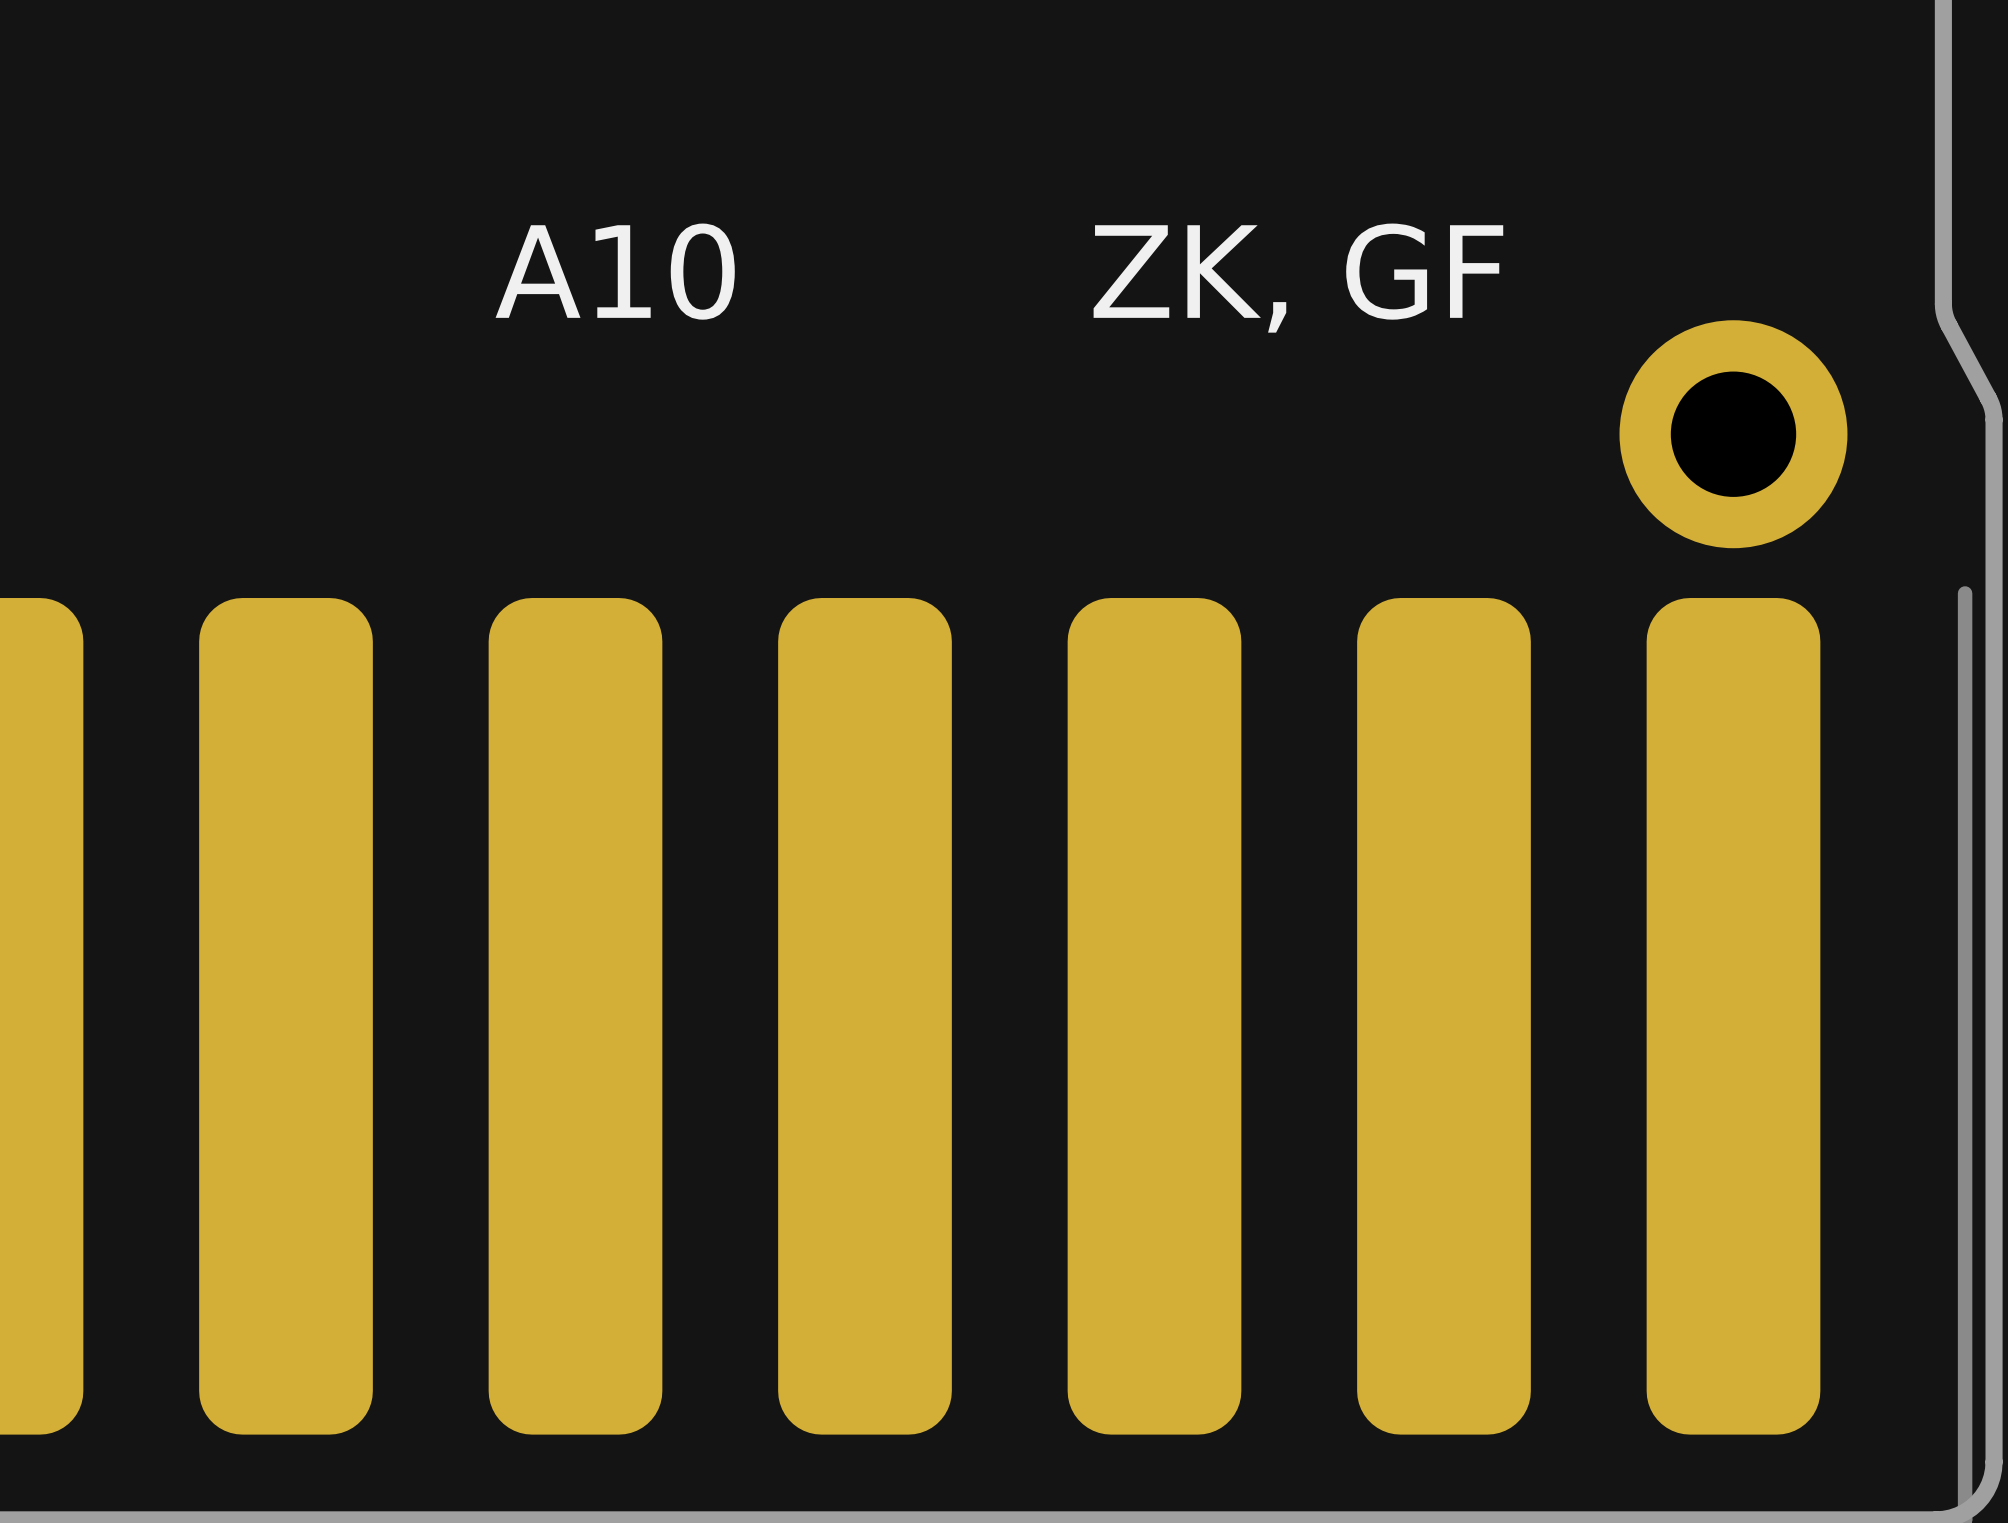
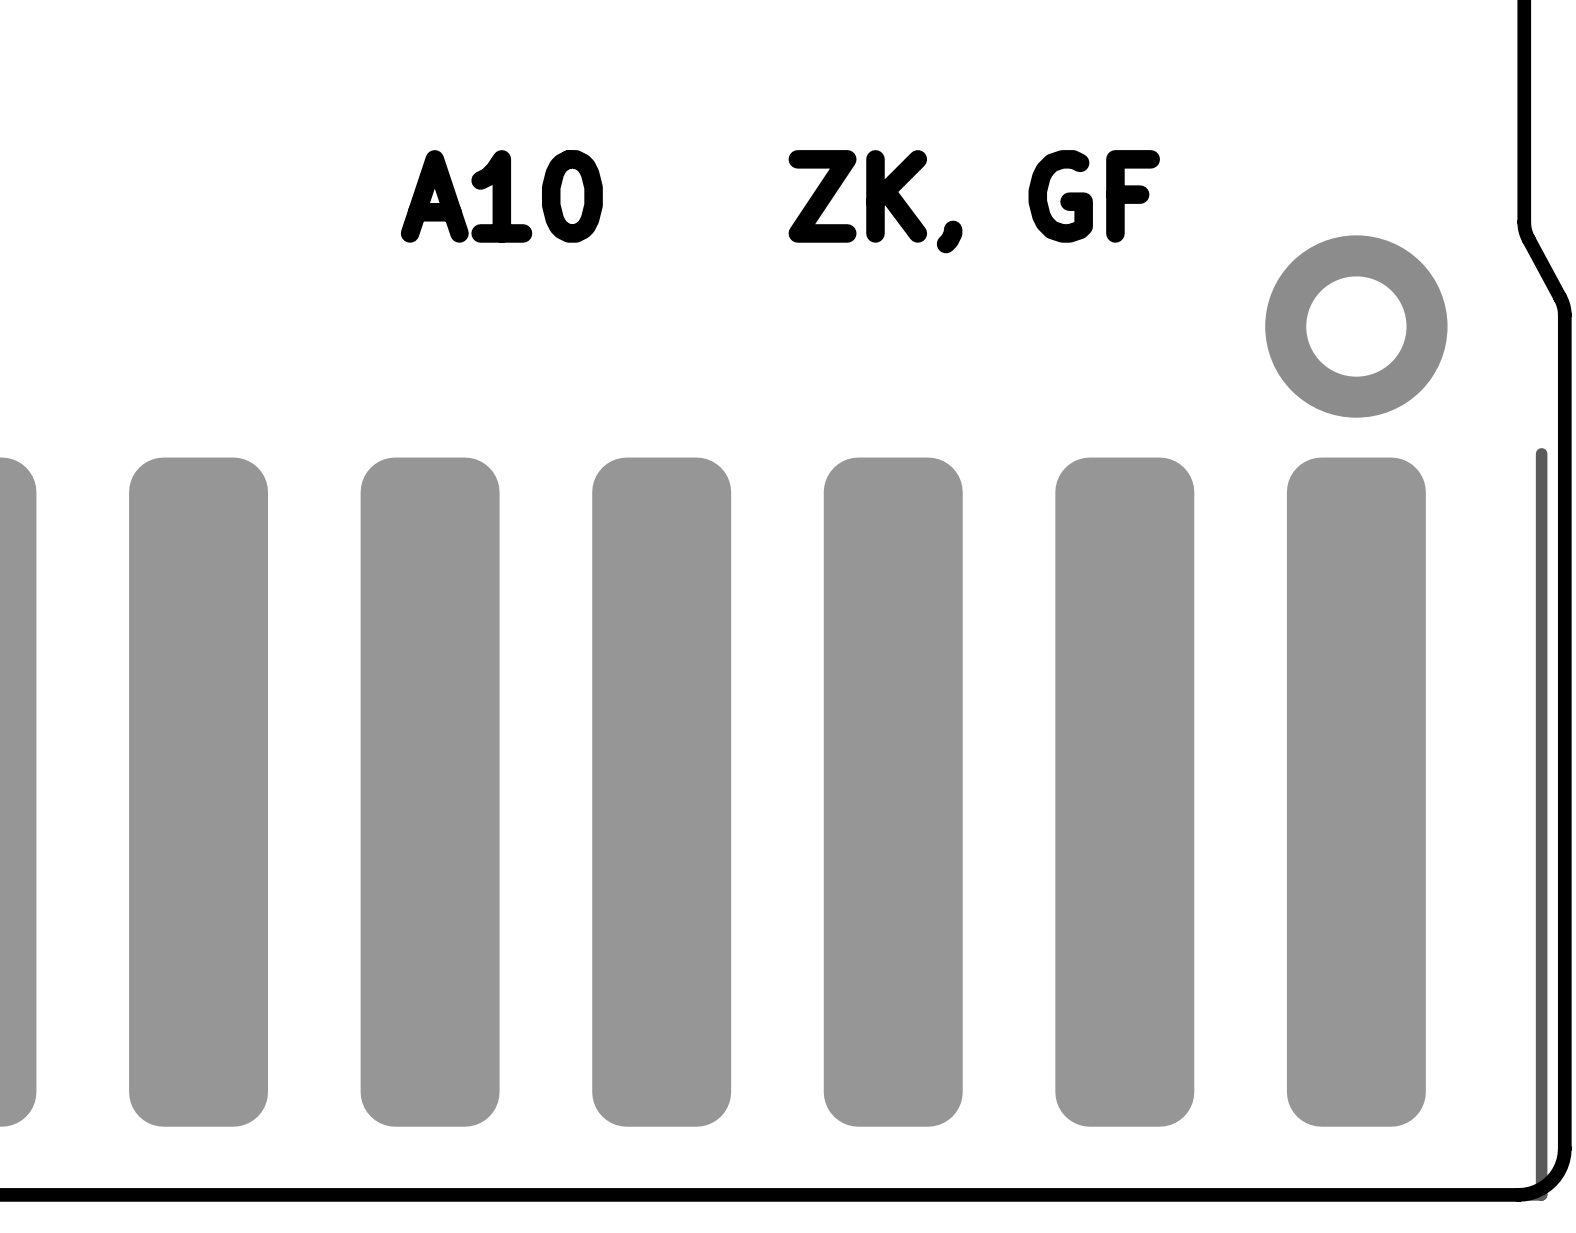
text position: A10 (615, 271) -> A10 (501, 196)
text position: ZK, GF (1298, 278) -> ZK, GF (974, 201)

